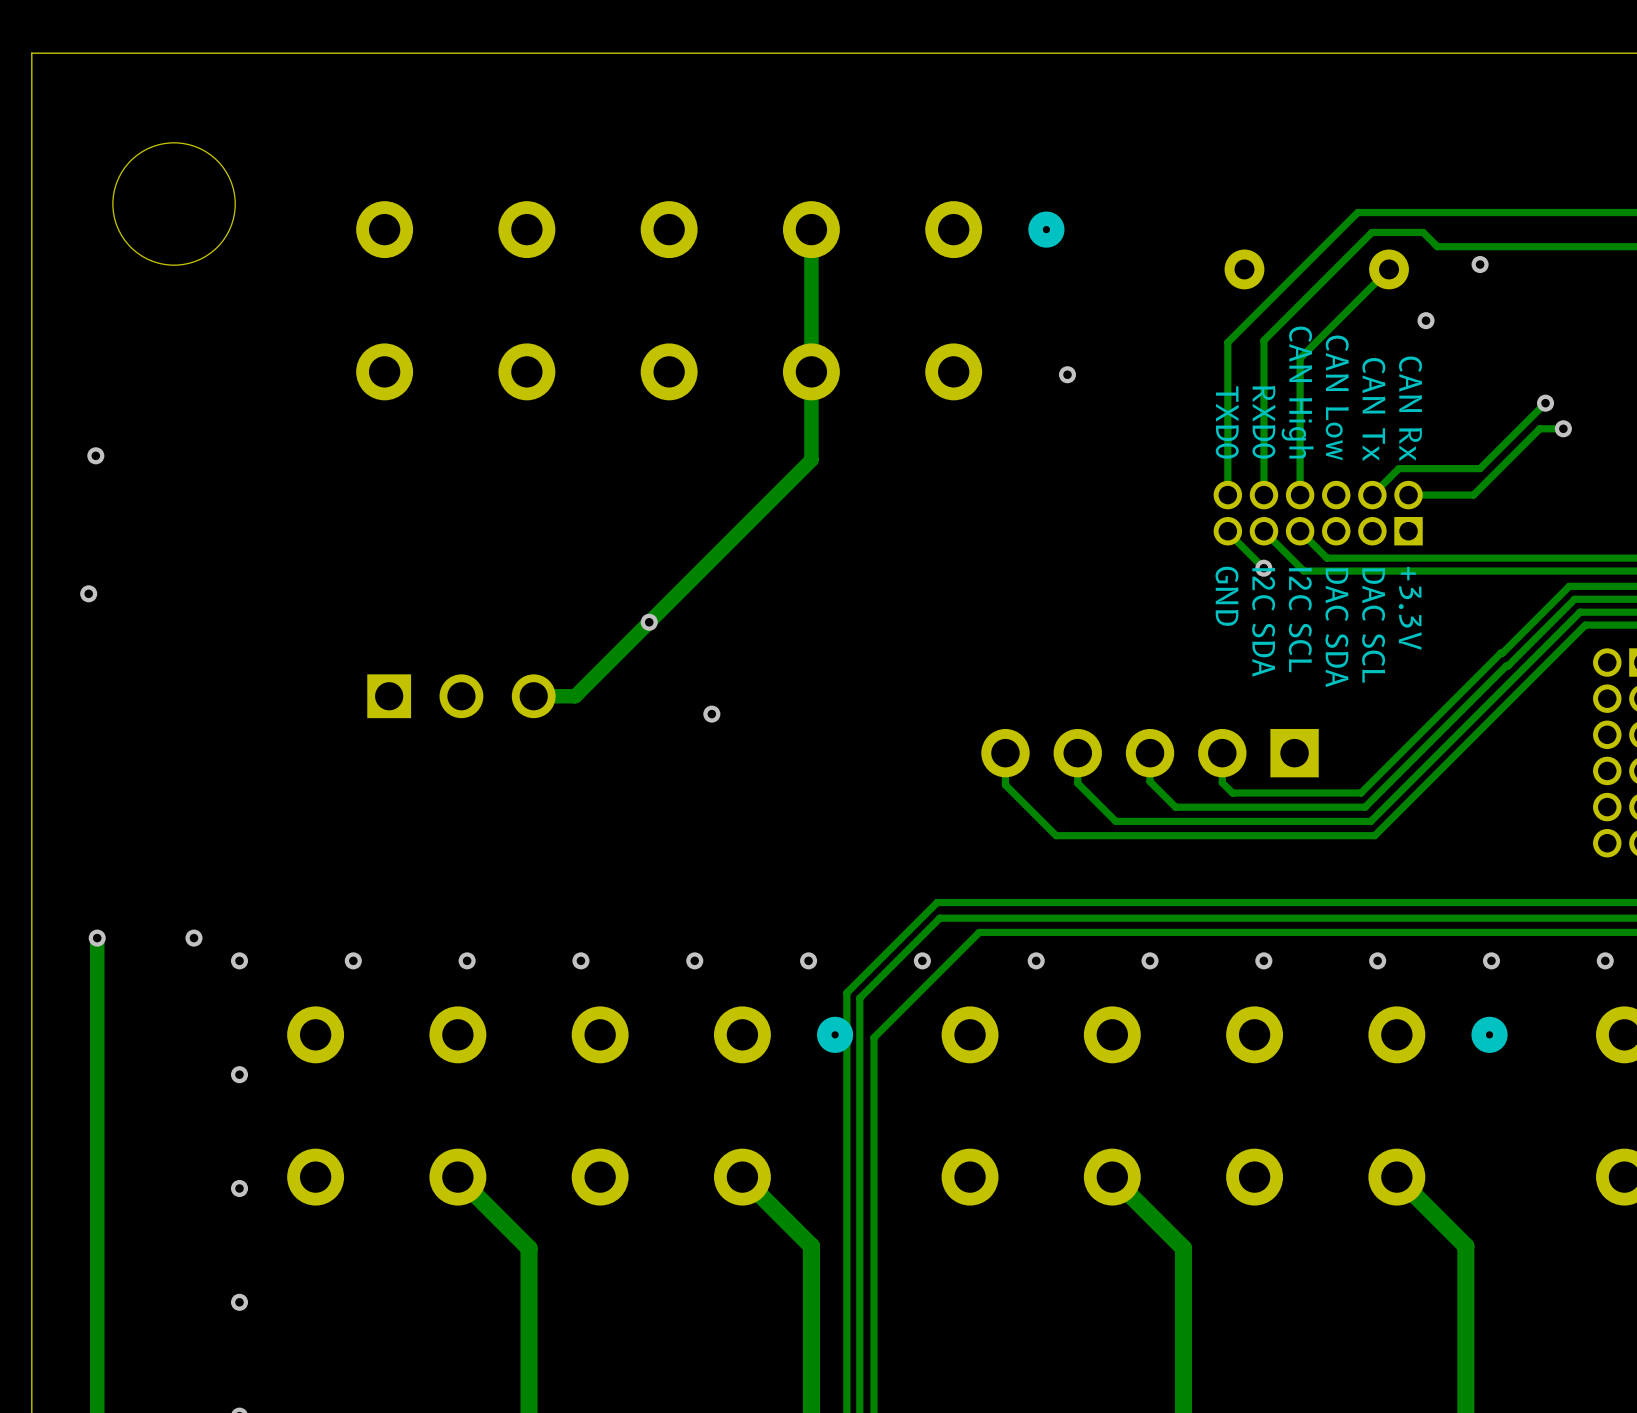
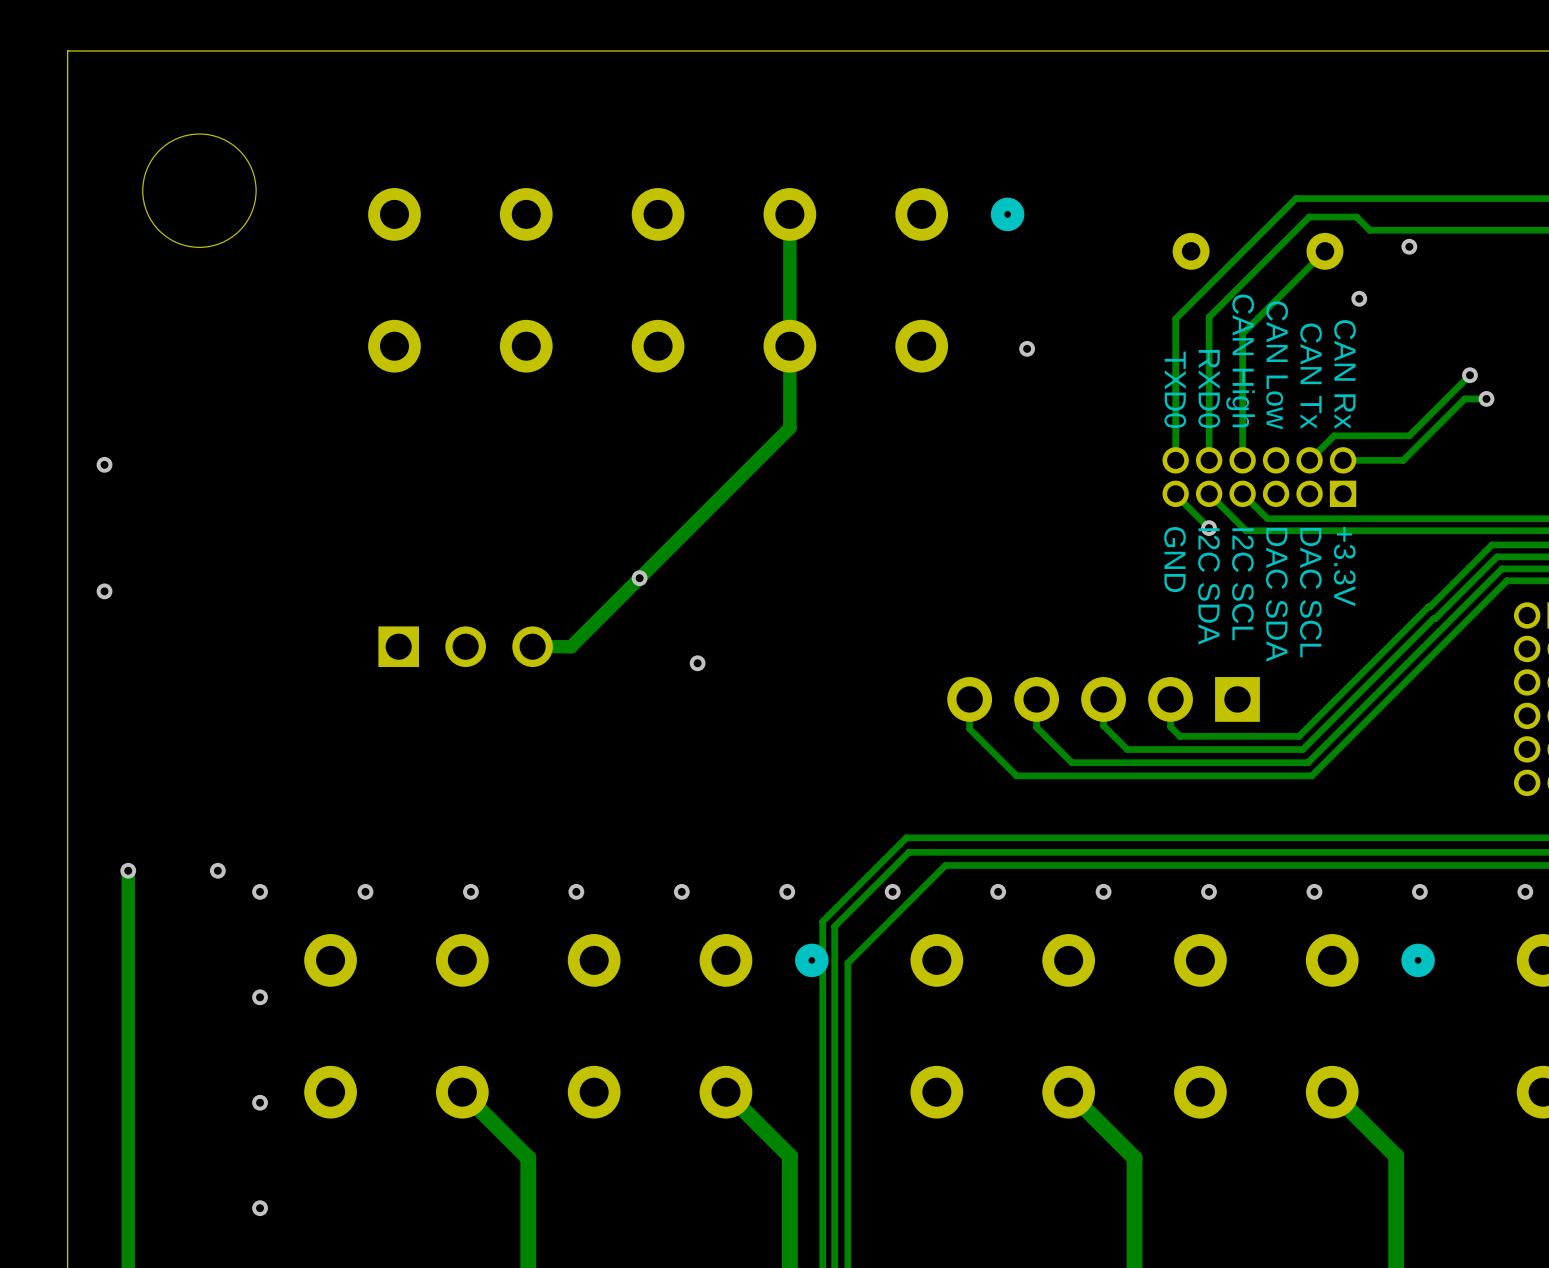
via: (95, 455) -> none
via: none -> (104, 464)
via position: (88, 593) -> (104, 591)

